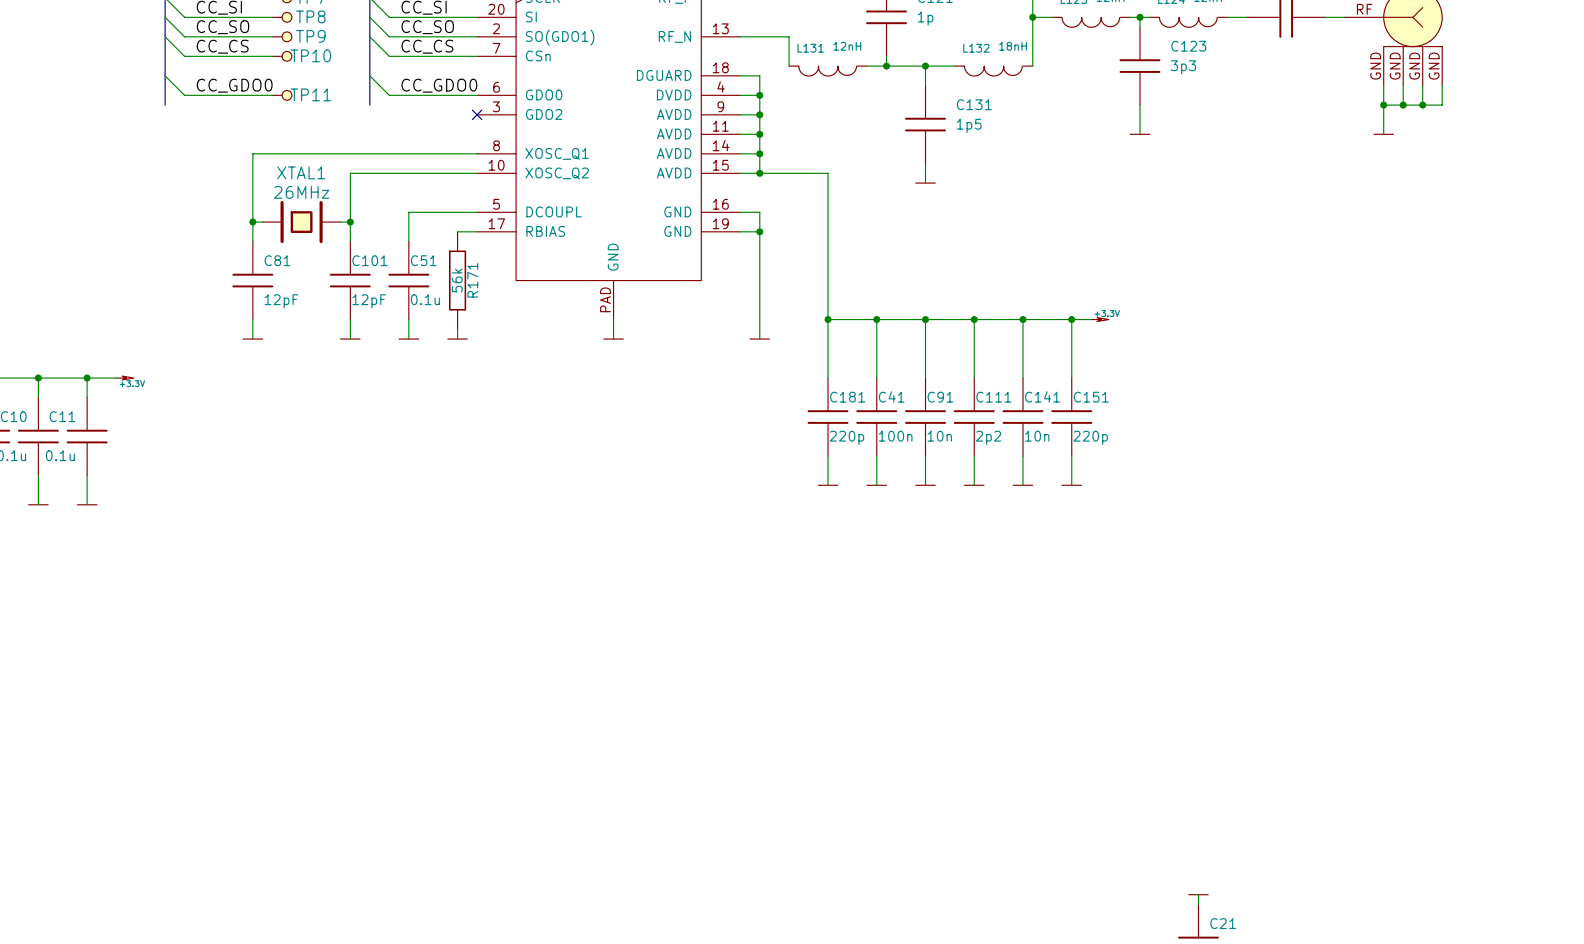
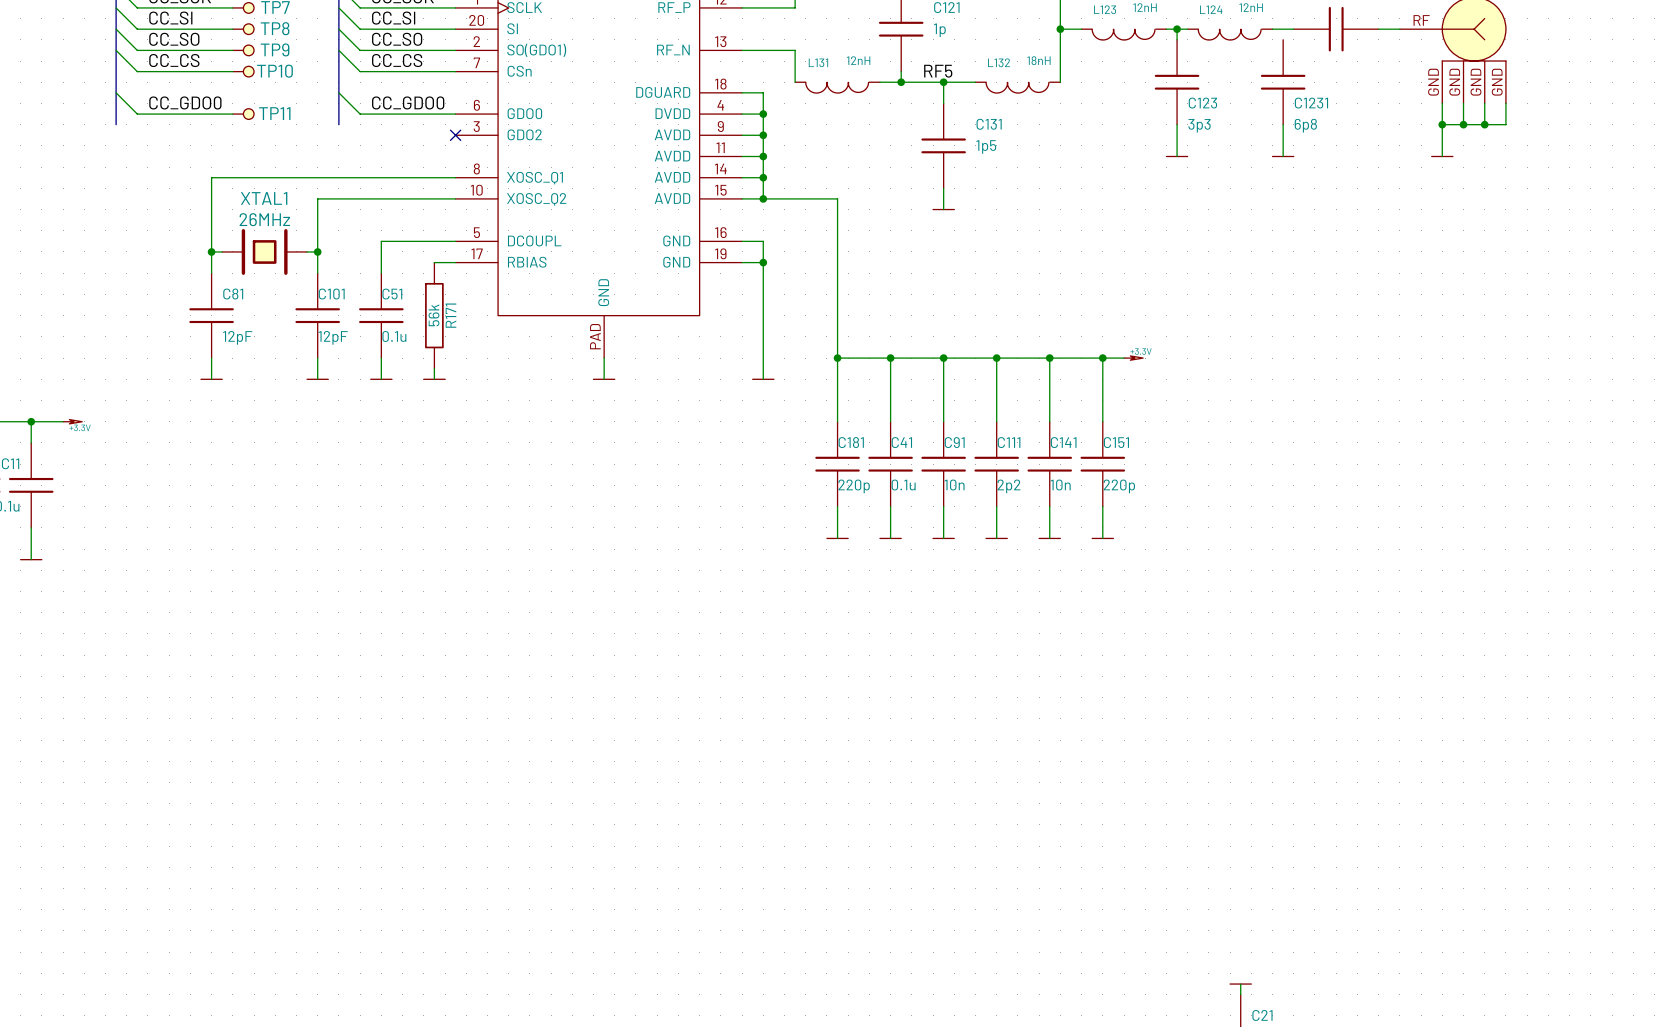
C123 name position: C123 (1188, 46) -> C123 (1202, 103)
label: none -> RF5 (938, 71)
C1231: none -> 6p8 (1283, 82)
C123 value position: 3p3 (1183, 67) -> 3p3 (1199, 125)
wire: none -> (1283, 124) (1283, 156)
power symbol: none -> (1283, 156)
C41 value: 100n (895, 436) -> 0.1u (903, 485)

